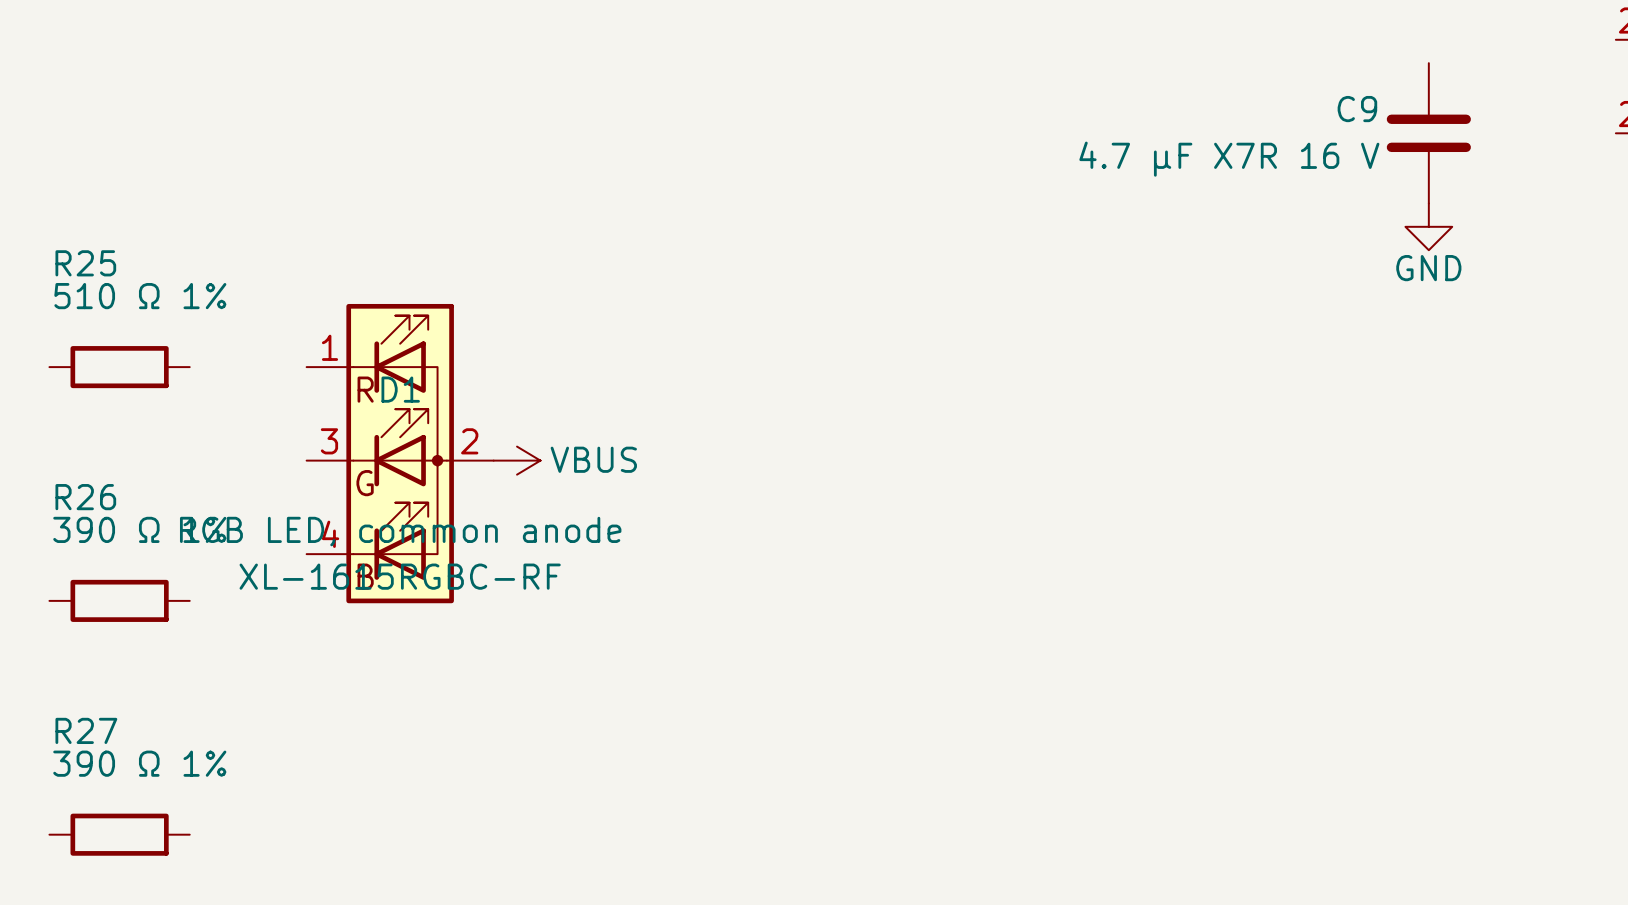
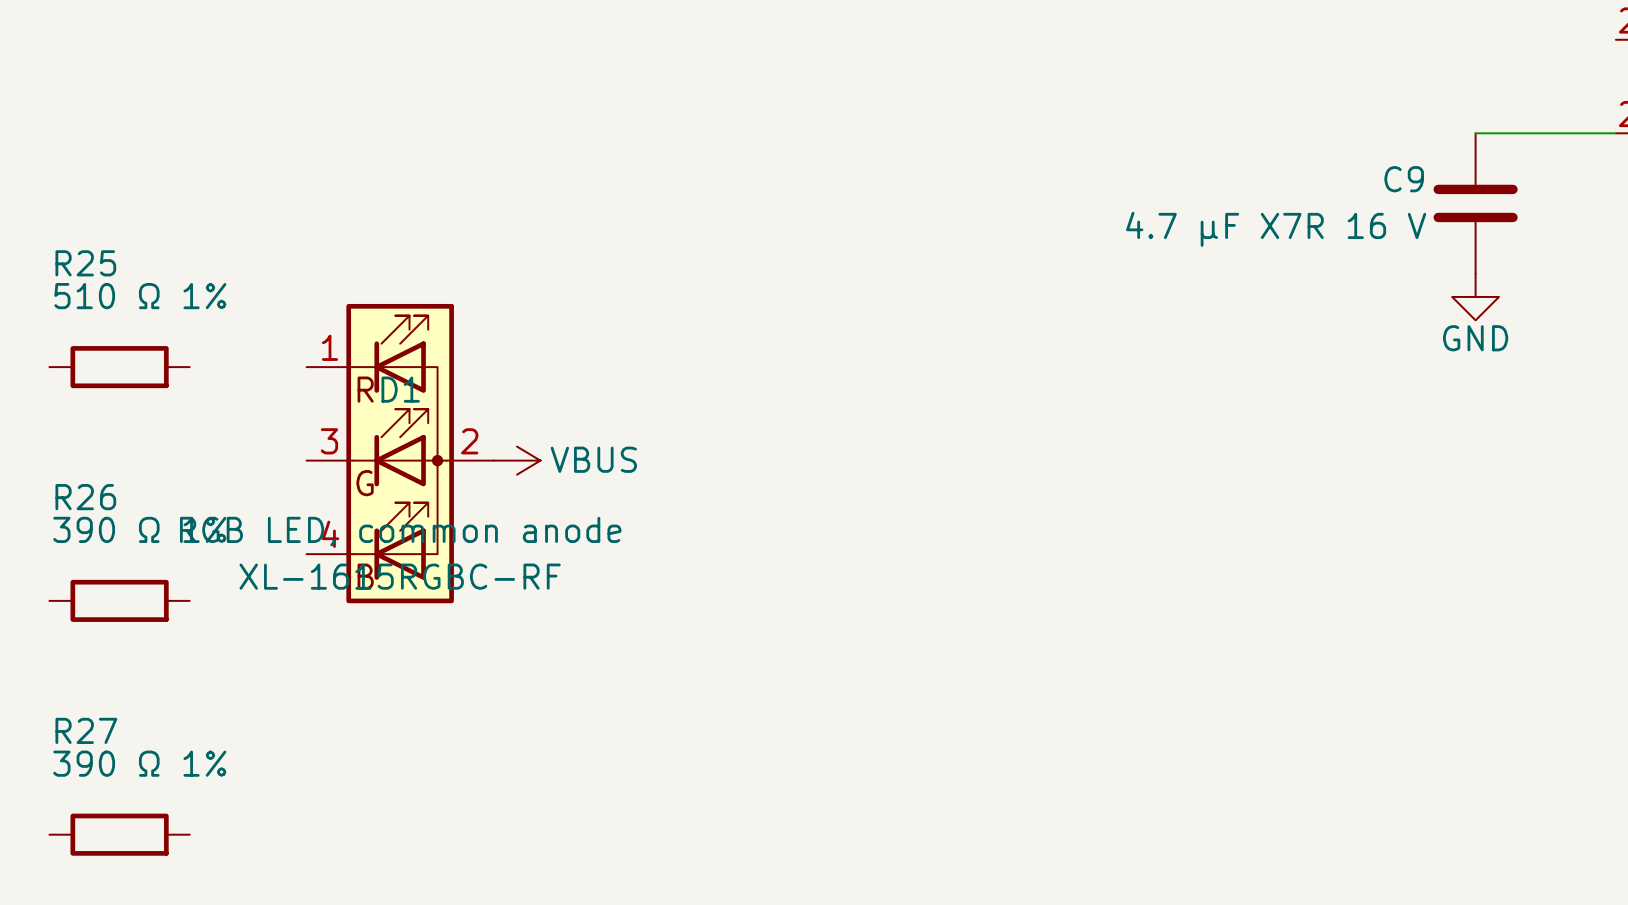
C9 position: (1428, 133) -> (1475, 203)
wire: none -> (1475, 133) (1615, 133)
power symbol position: GND (1428, 226) -> GND (1475, 296)

